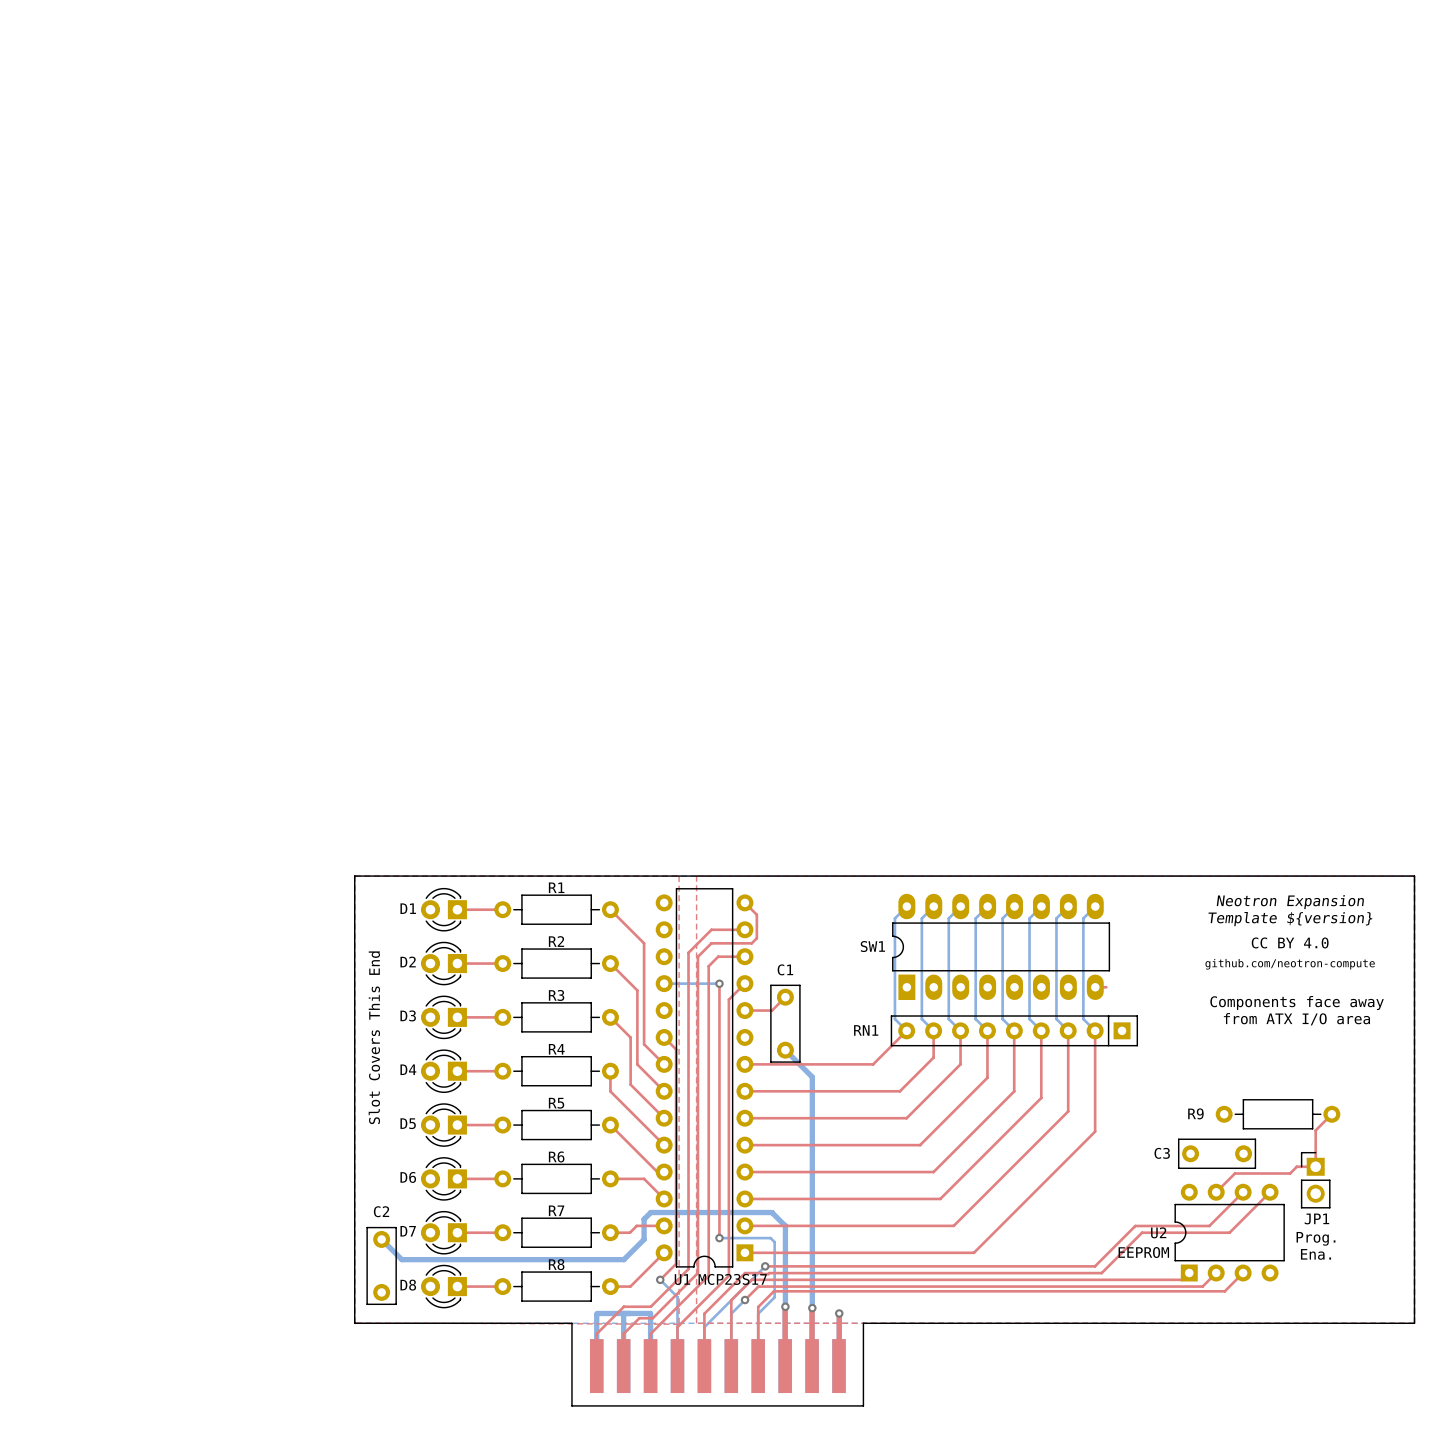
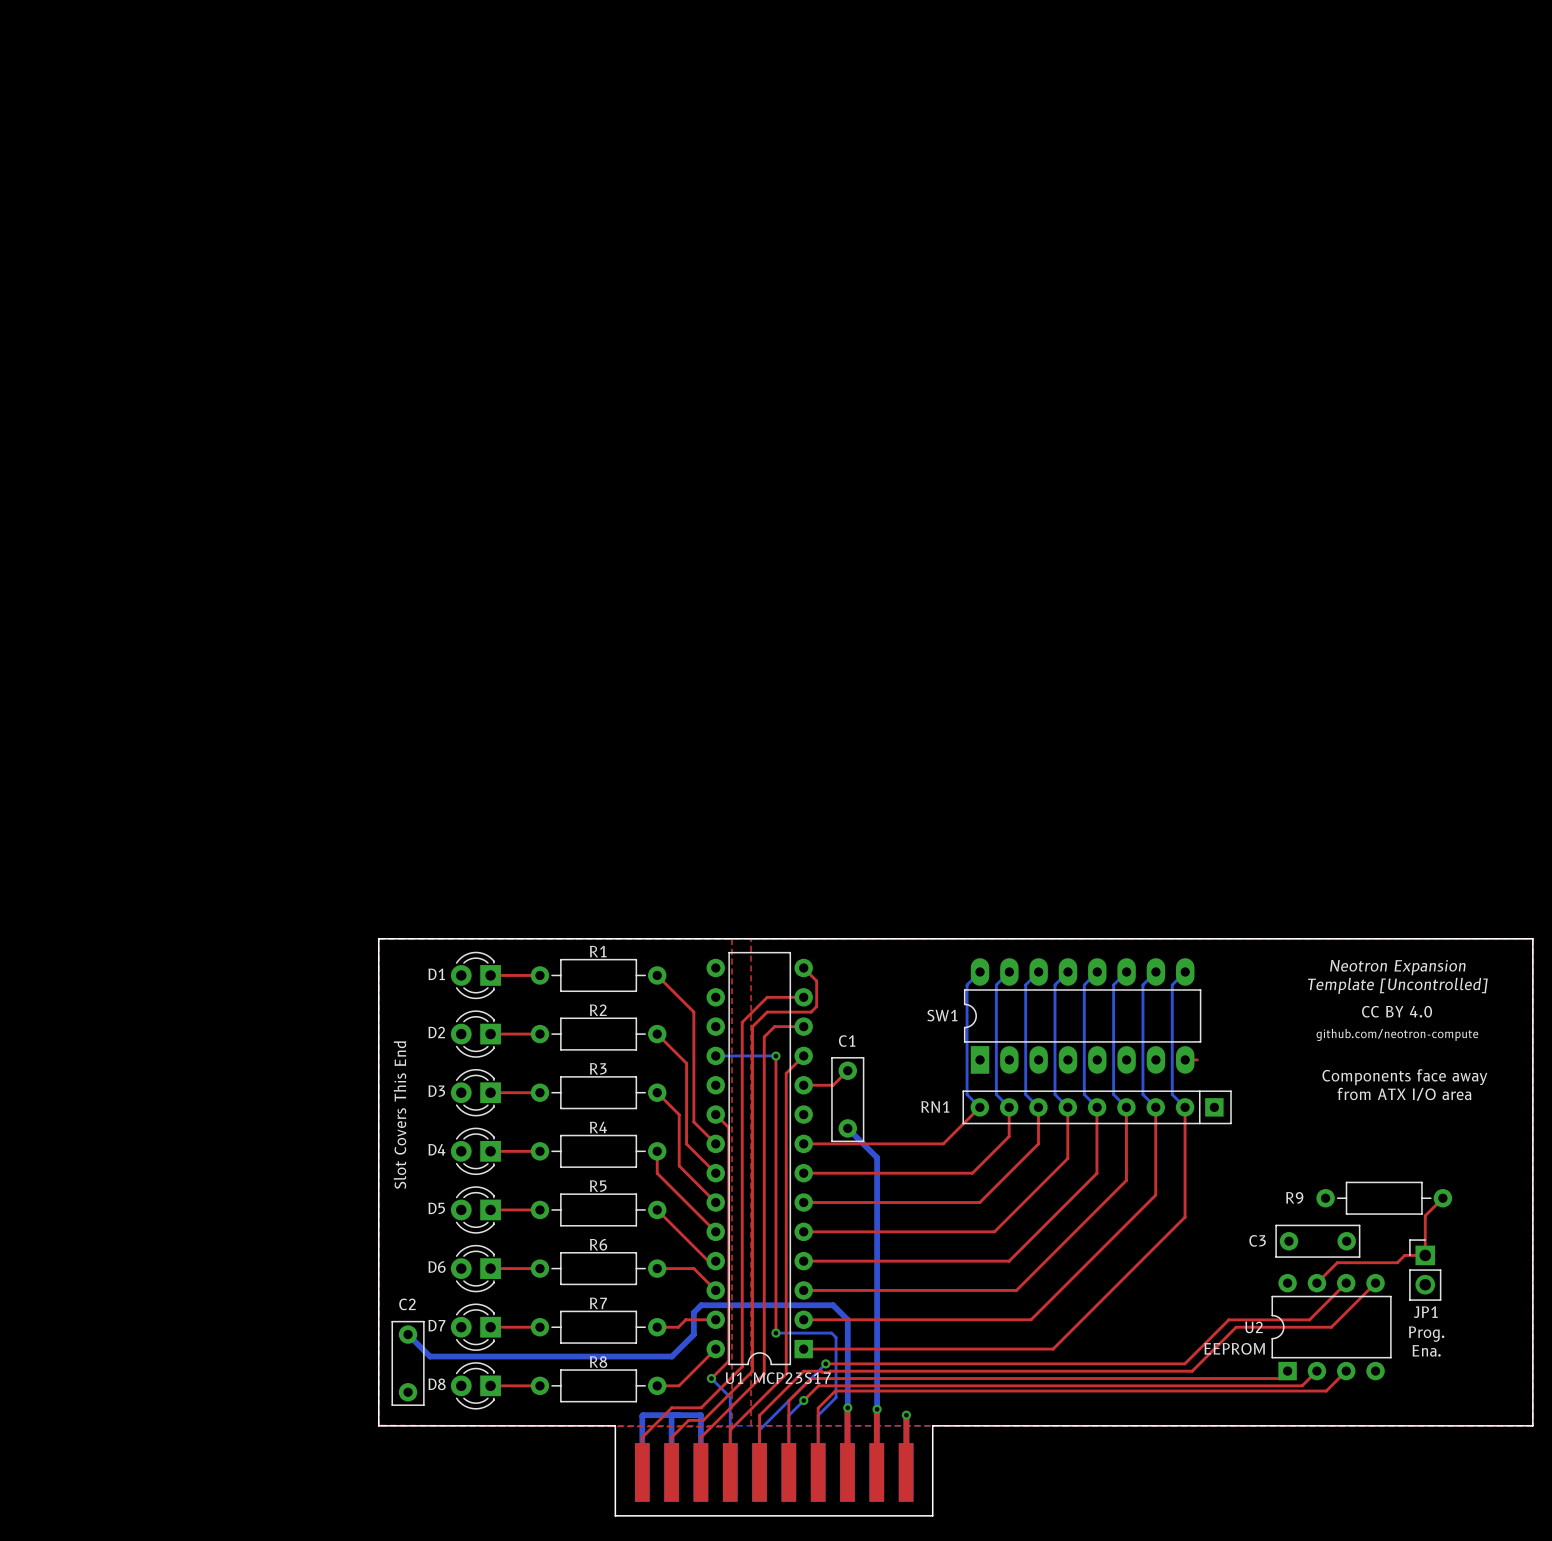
text: Template ${version} (1290, 919) -> Template [Uncontrolled] (1397, 985)

